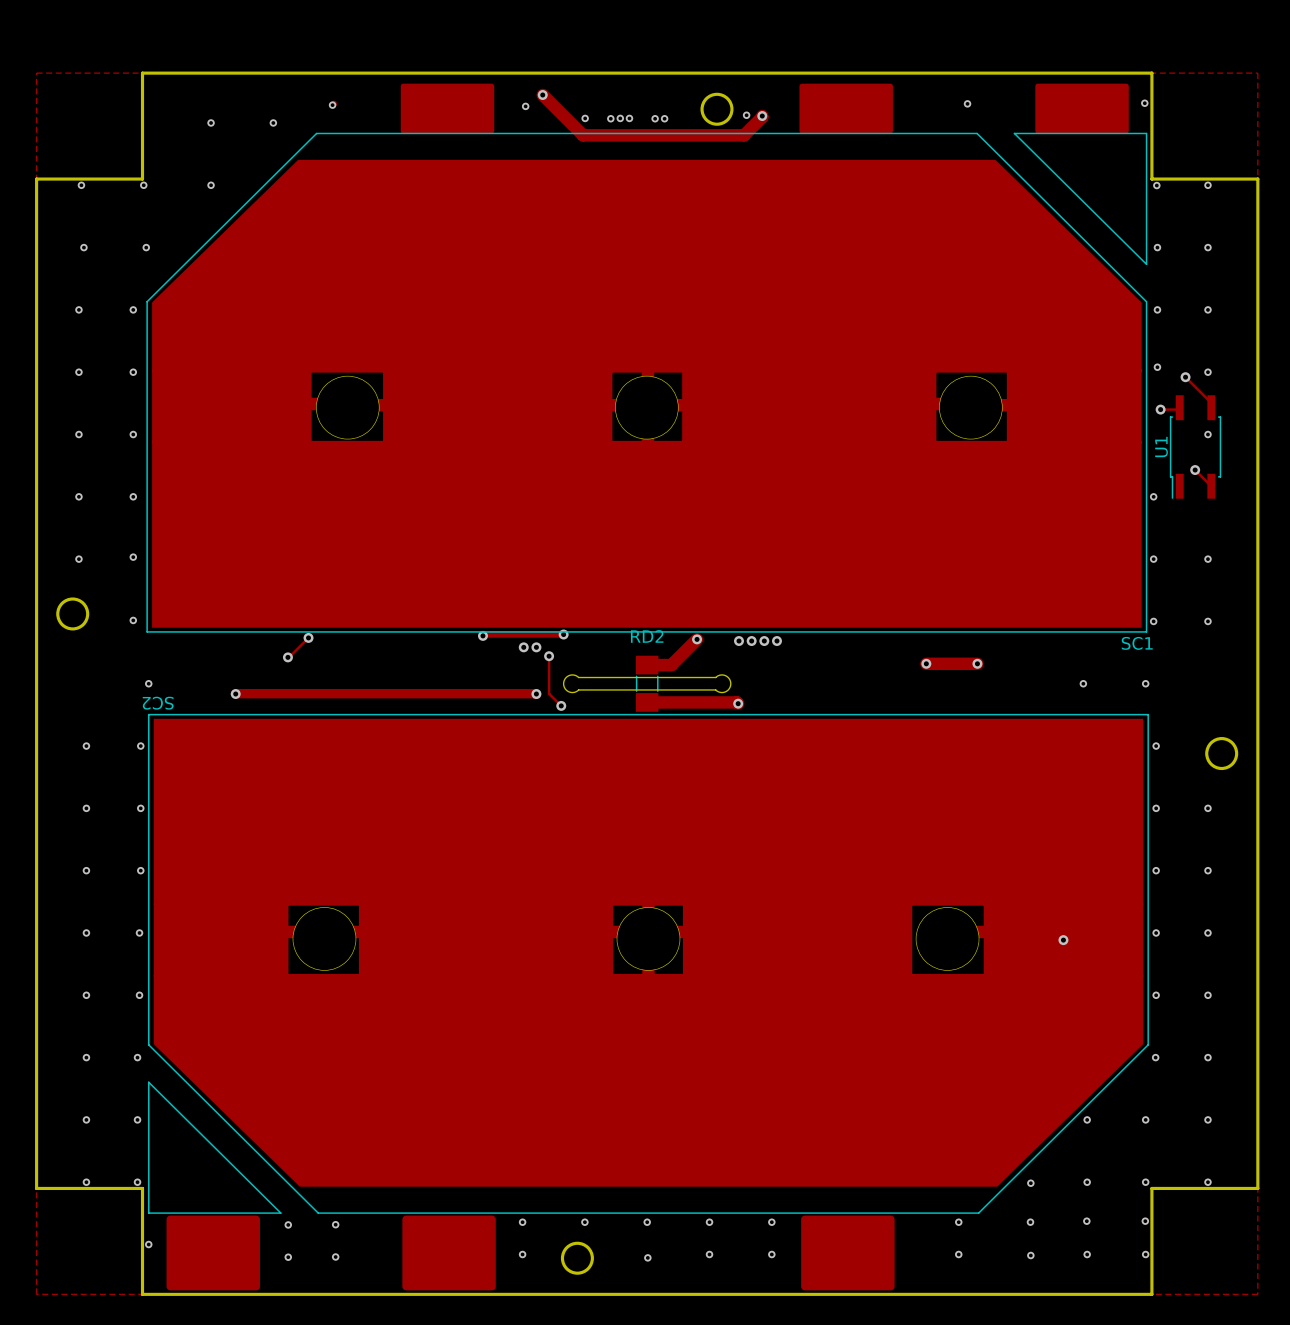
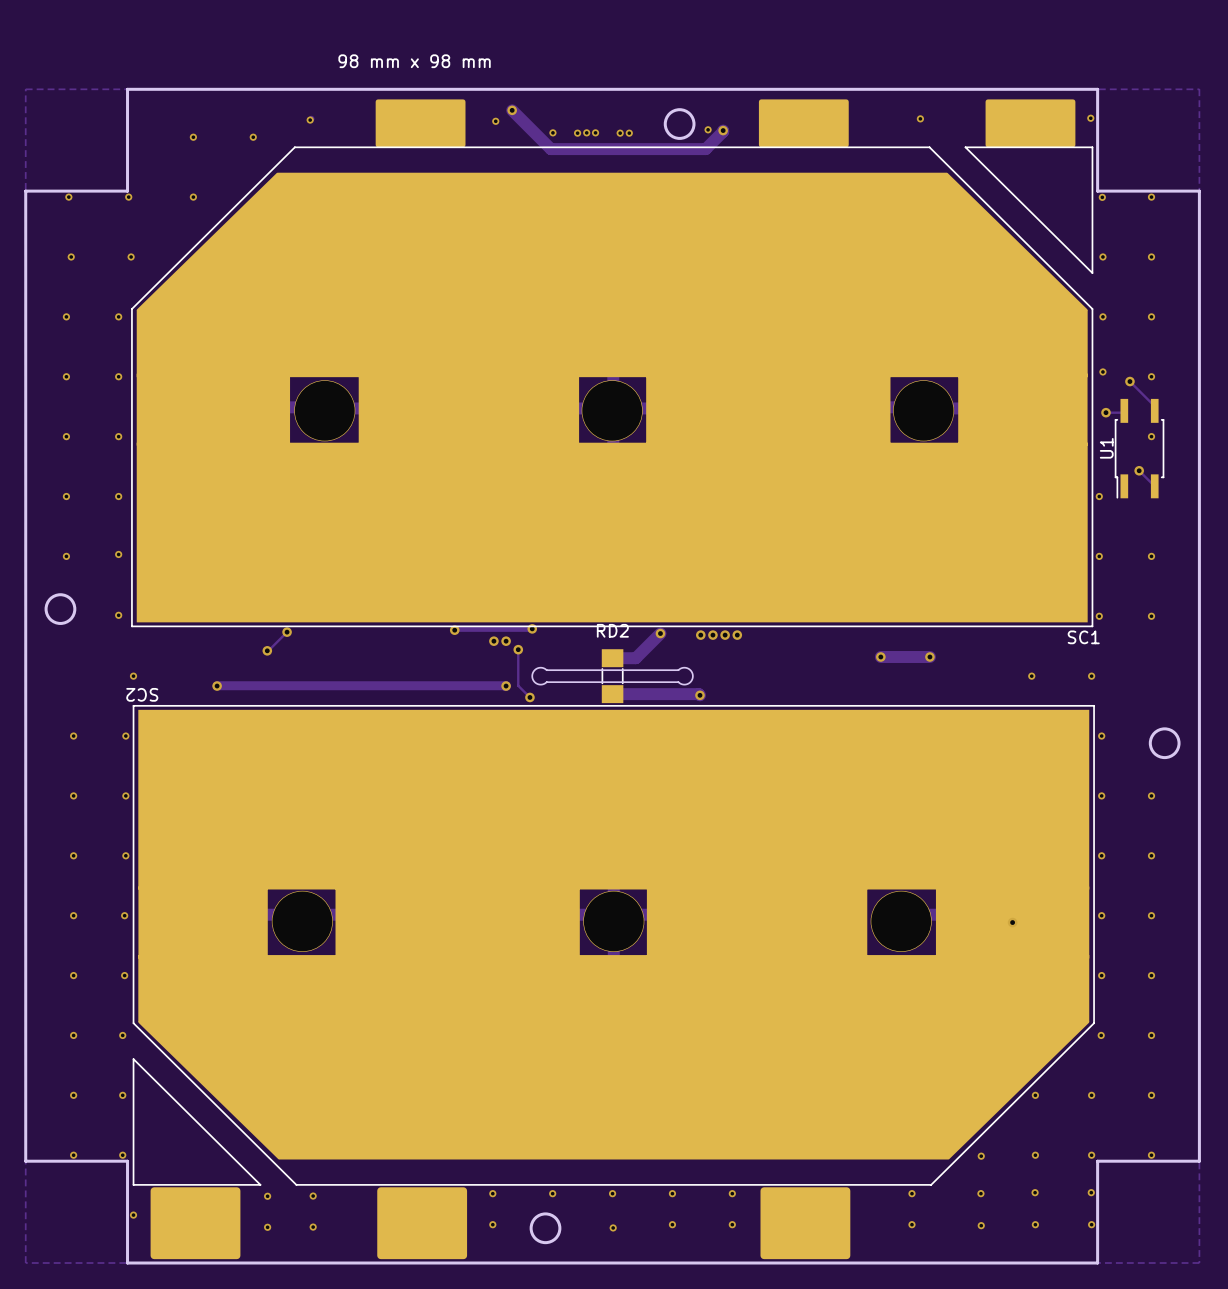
text: none -> 98 mm x 98 mm (414, 61)

